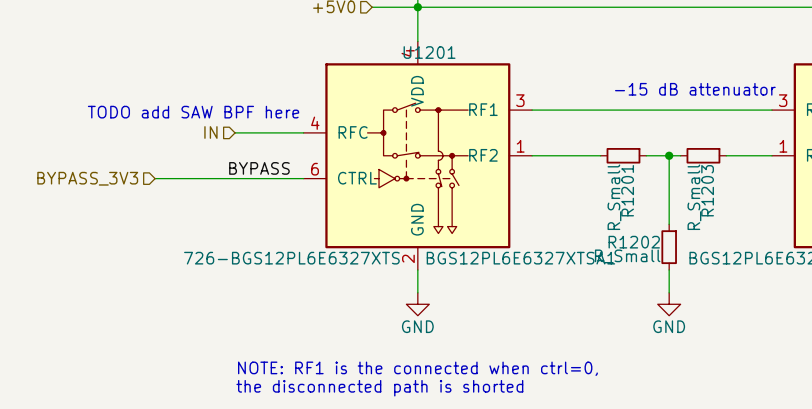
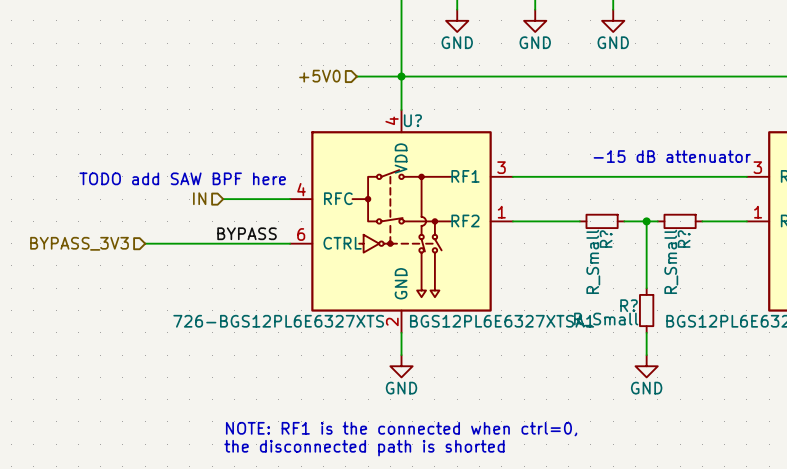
U1201 name: U1201 (429, 52) -> U? (412, 120)
R1201 name: R1201 (627, 190) -> R? (606, 239)
R1203 name: R1203 (707, 190) -> R? (684, 239)
R1202 name: R1202 (634, 242) -> R? (629, 305)

